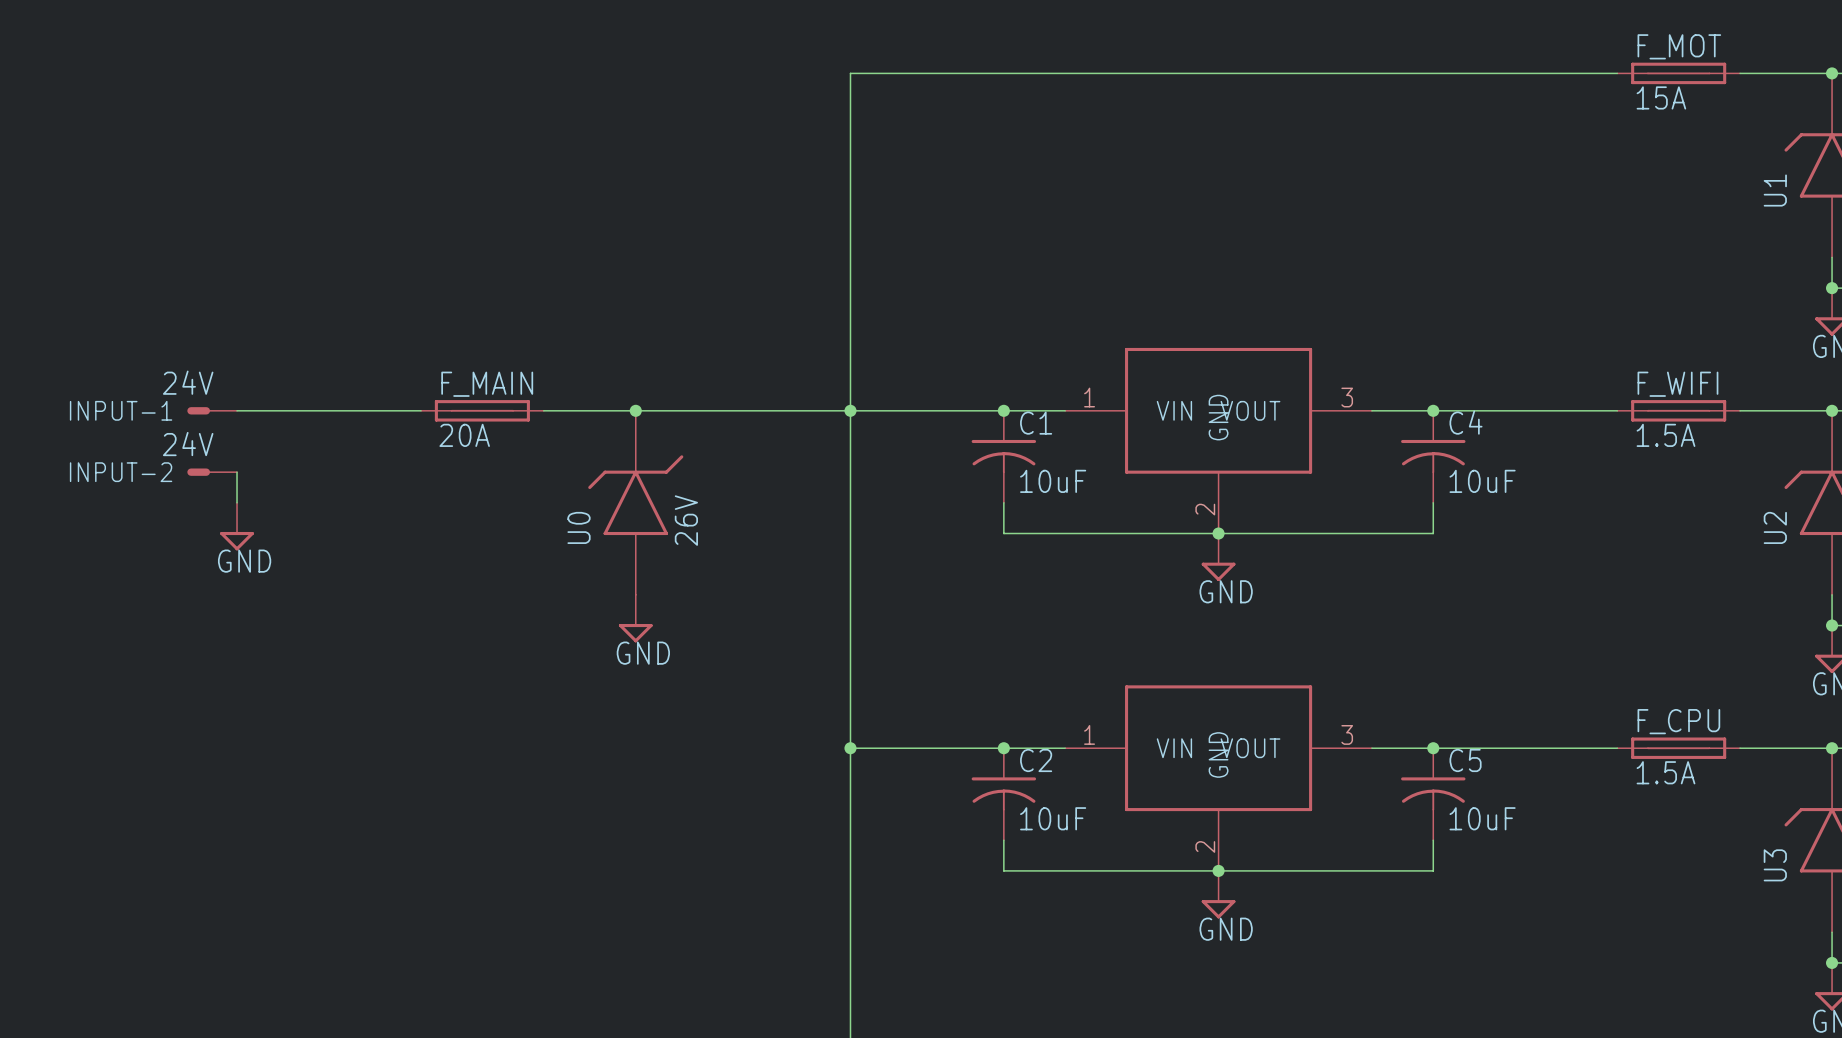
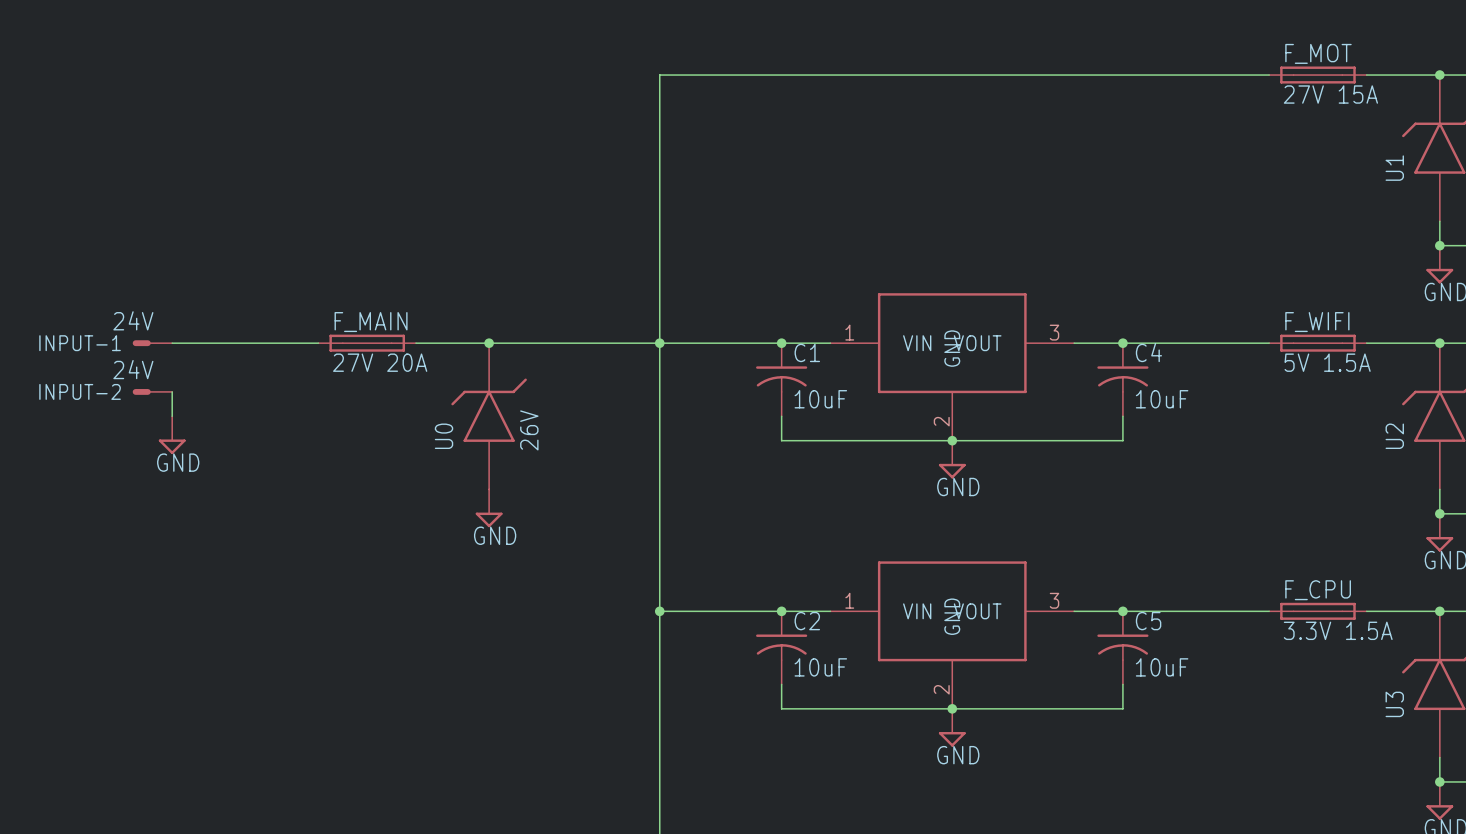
F_MOT value: 15A (1661, 97) -> 27V 15A (1330, 94)
F_MAIN value: 20A (464, 435) -> 27V 20A (380, 362)
F_WIFI value: 1.5A (1665, 435) -> 5V 1.5A (1327, 362)
F_CPU value: 1.5A (1665, 772) -> 3.3V 1.5A (1338, 630)

